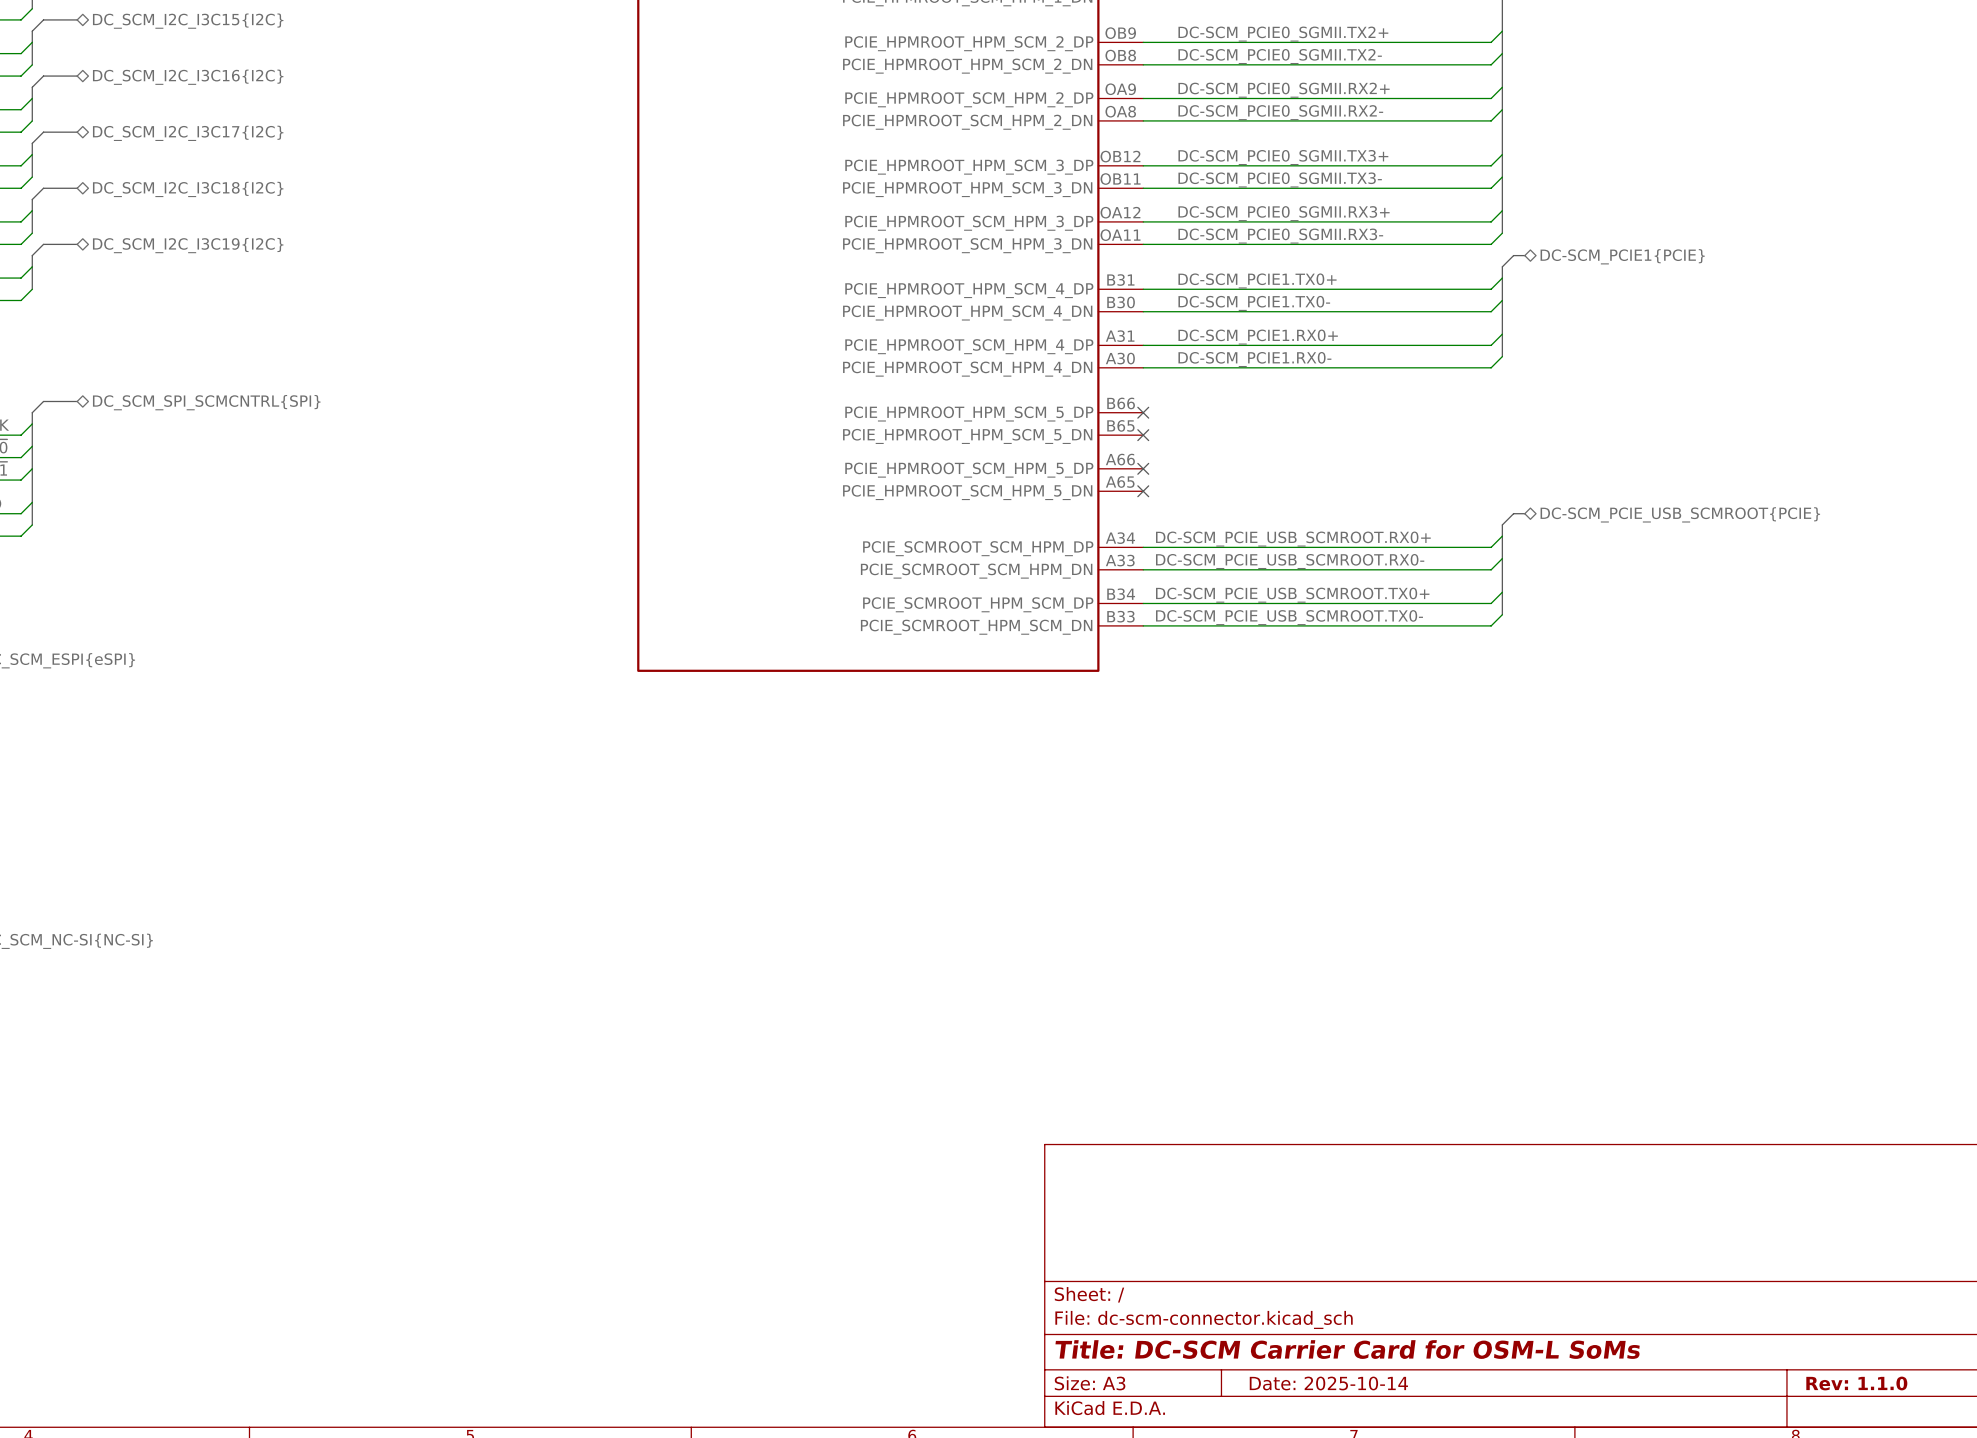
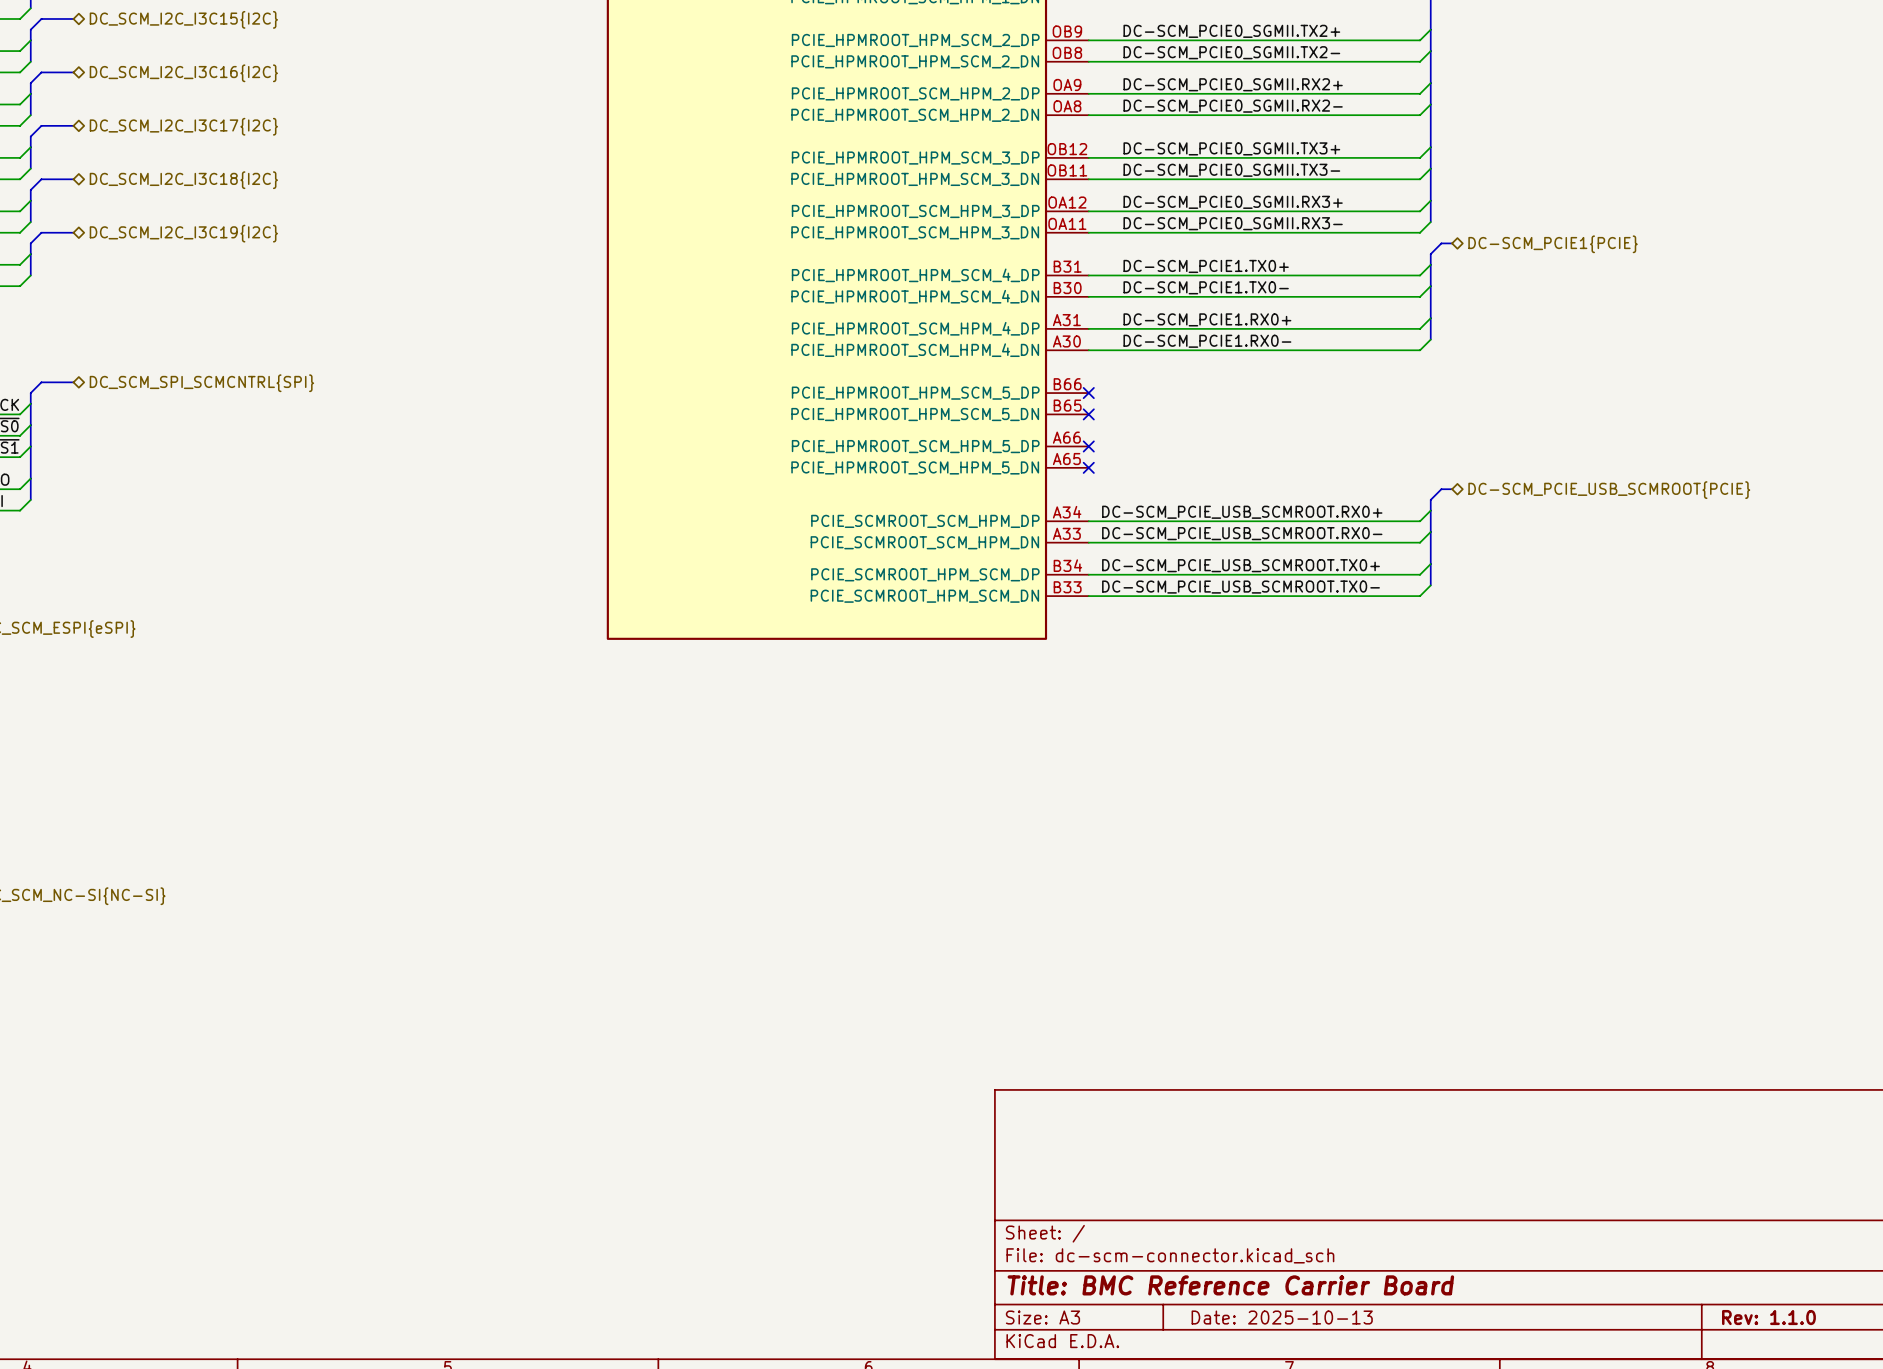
title block: Title: DC-SCM Carrier Card for OSM-L SoMs (1347, 1349) -> Title: BMC Reference Carrier Board (1230, 1285)
title block: Date: 2025-10-14 (1328, 1383) -> Date: 2025-10-13 (1282, 1317)

